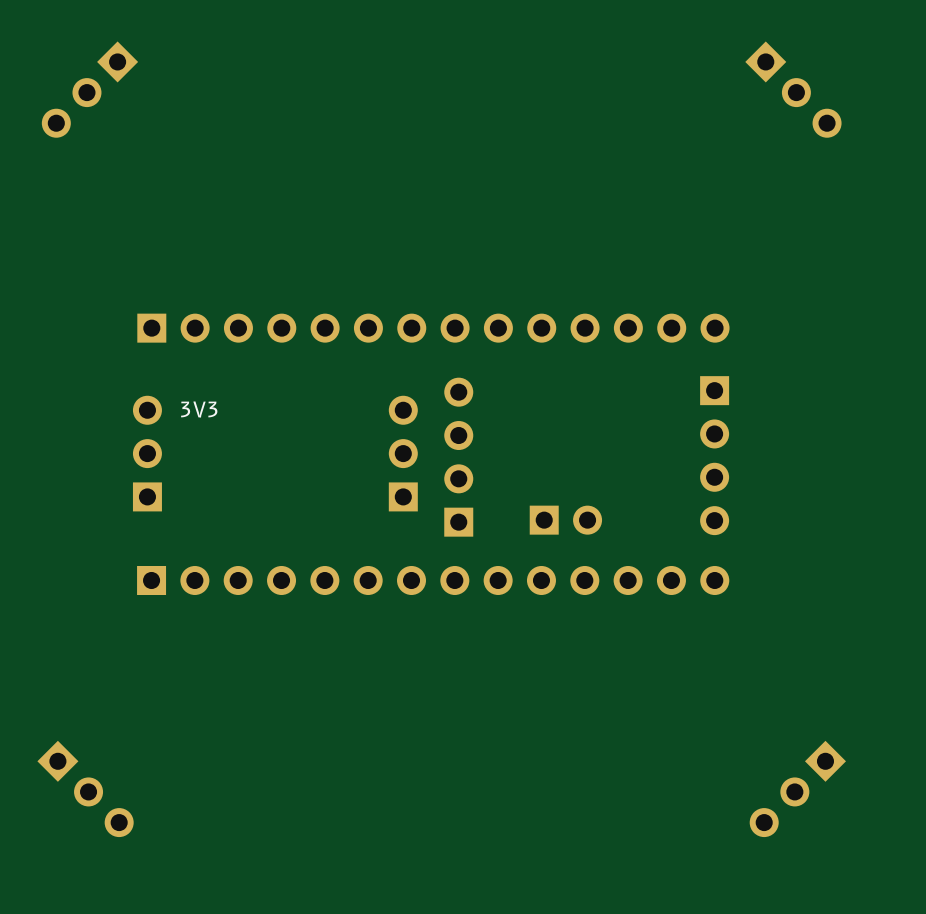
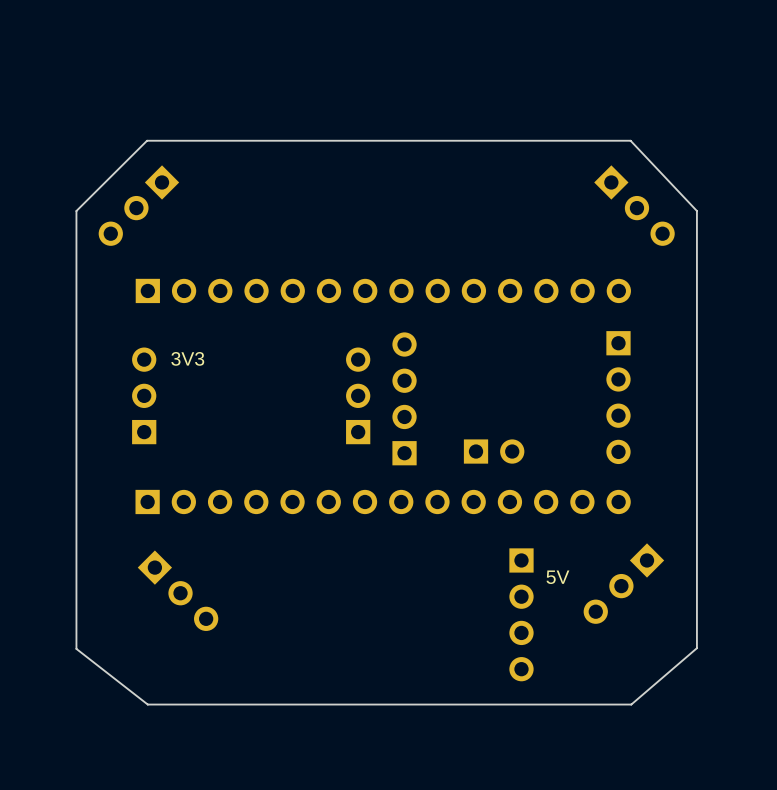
part position: (89, 89) -> (138, 205)
part position: (793, 89) -> (634, 205)
board edge: none -> (630, 140) (696, 211) (696, 648) (631, 704) (147, 704) (76, 648) (76, 211) (147, 140) (630, 140)
text: none -> 5V (557, 577)
part: none -> (521, 614)
part position: (85, 788) -> (178, 590)
part position: (797, 788) -> (623, 583)

